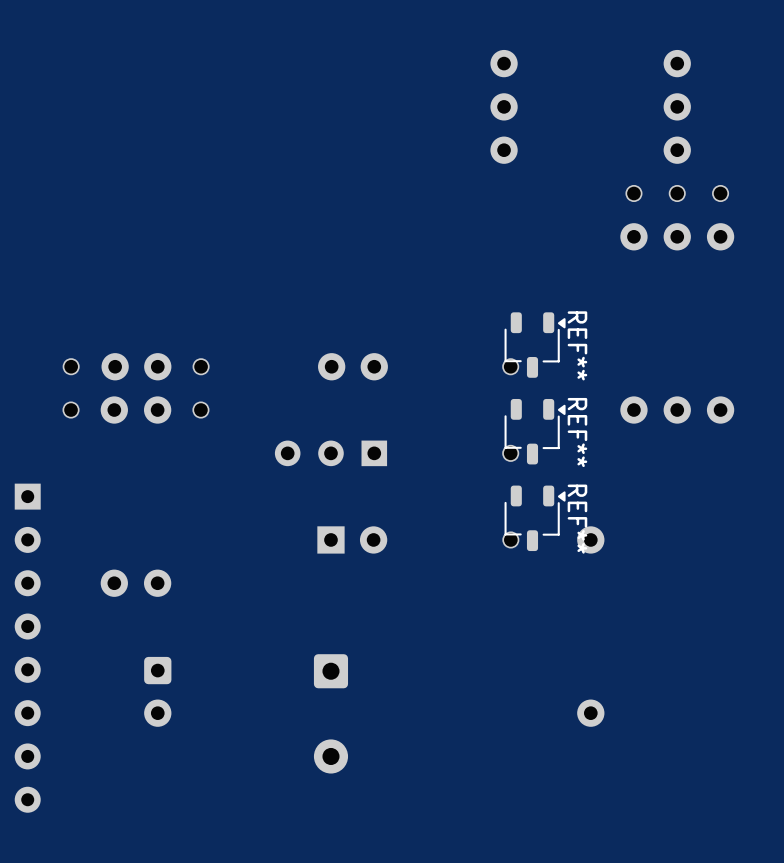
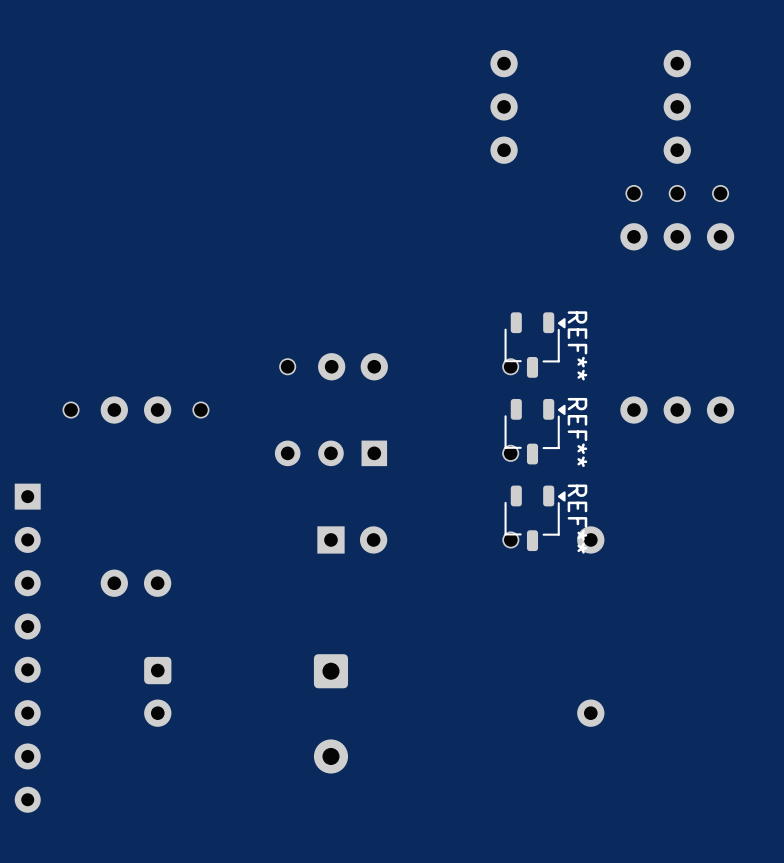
part: (71, 366) -> none
part: (136, 366) -> none
part position: (201, 366) -> (287, 366)

